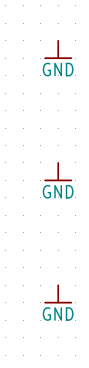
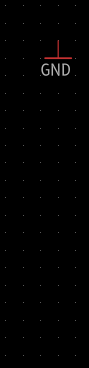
power symbol: GND (58, 172) -> none
power symbol: GND (58, 294) -> none

